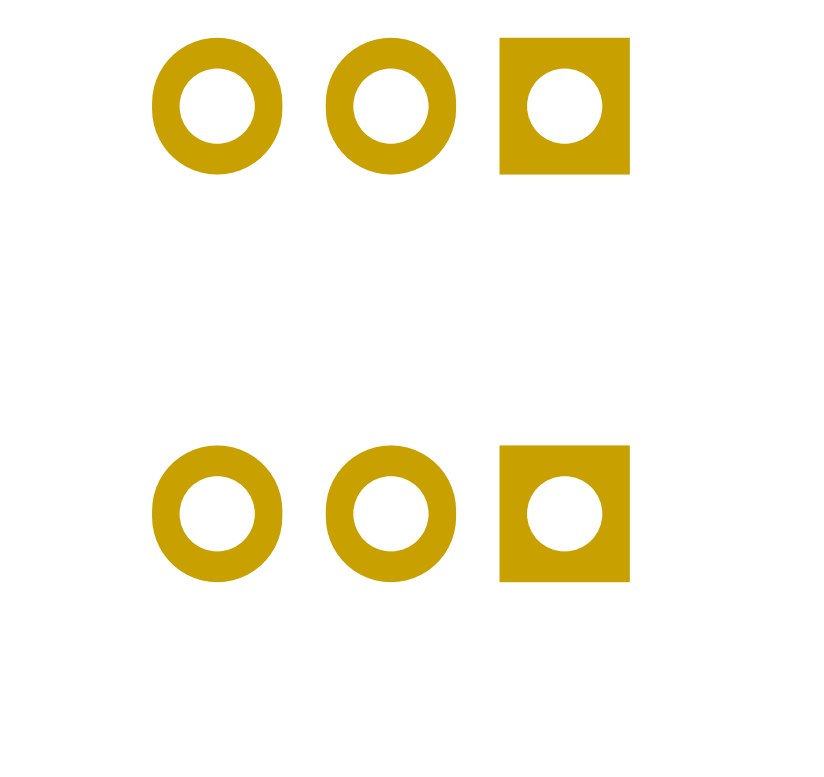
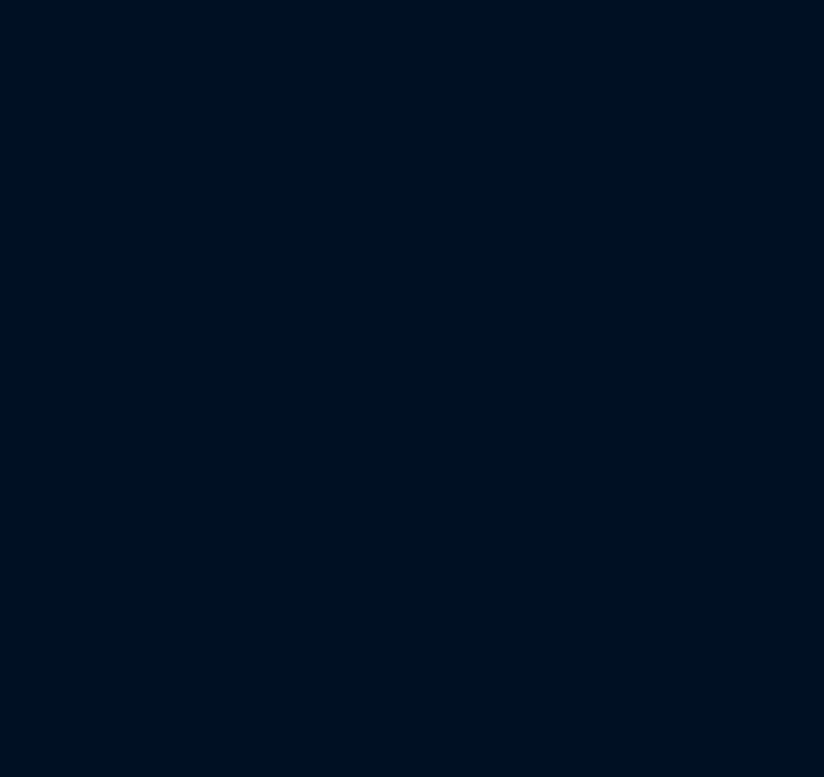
part: (390, 106) -> none
part: (390, 513) -> none

